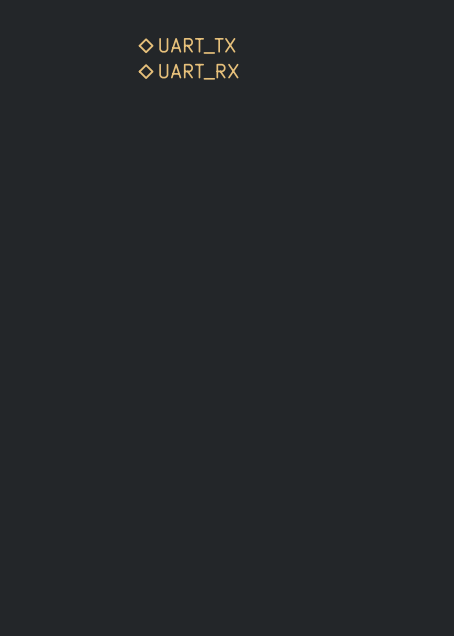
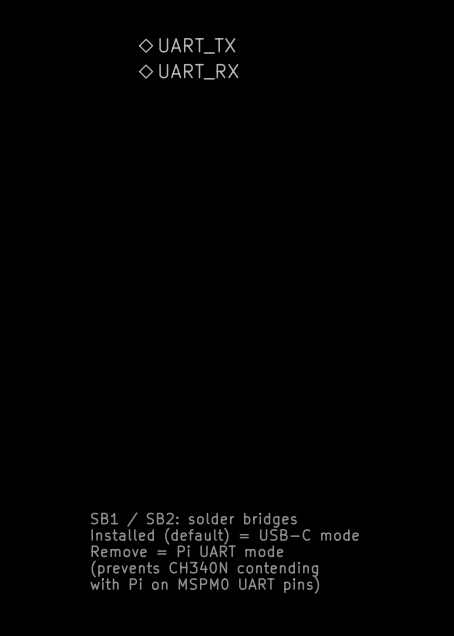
text: none -> SB1 / SB2: solder bridges (193, 520)
text: none -> Installed (default) = USB-C mode (225, 536)
text: none -> Remove = Pi UART mode (187, 551)
text: none -> (prevents CH340N contending (204, 568)
text: none -> with Pi on MSPM0 UART pins) (204, 585)

